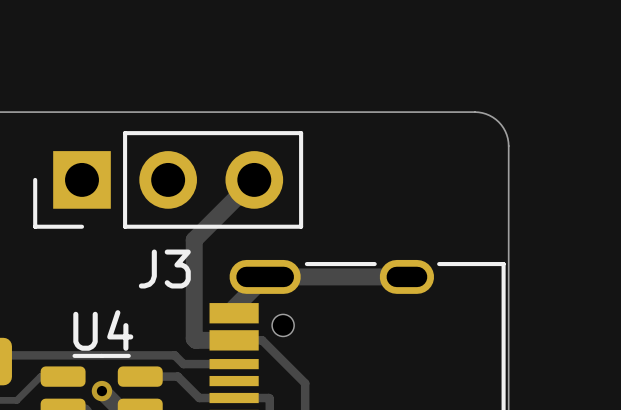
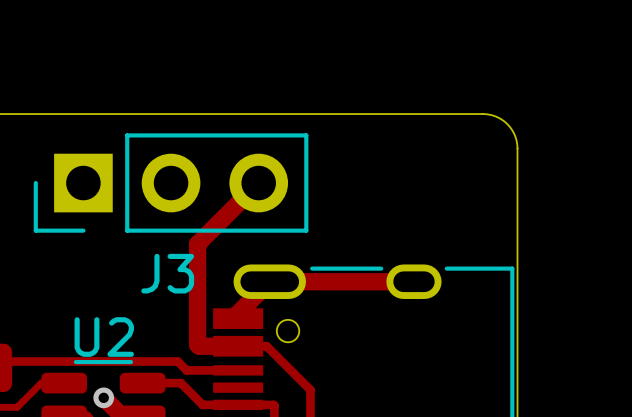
U4 name: U4 (103, 330) -> U2 (104, 337)

